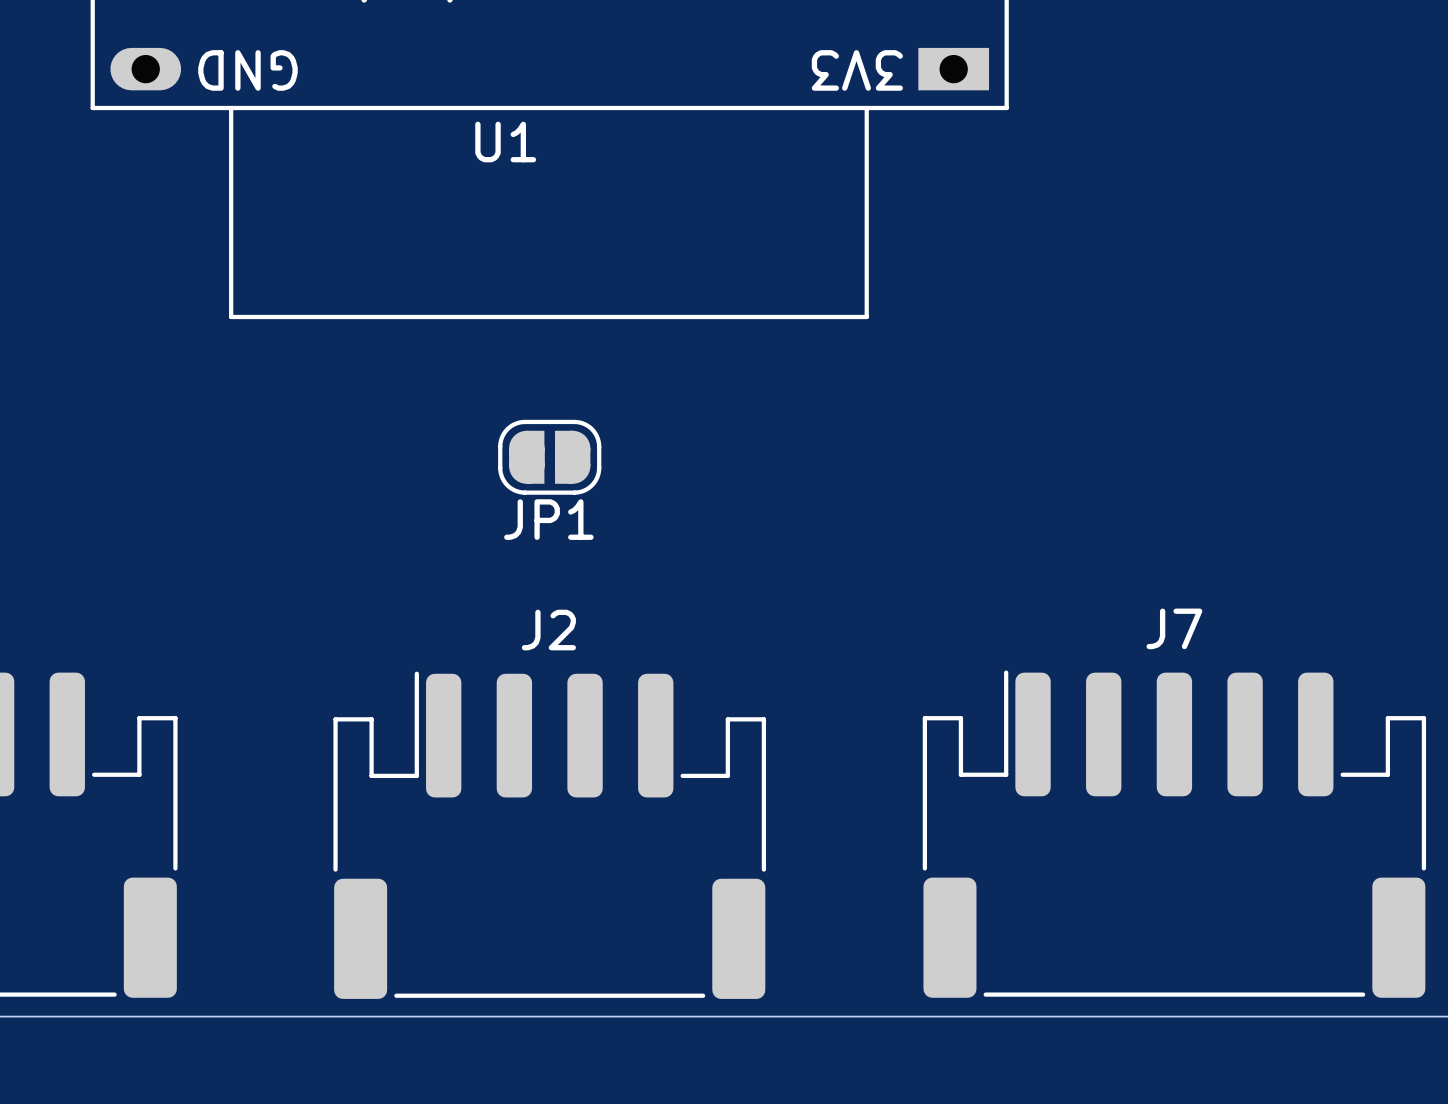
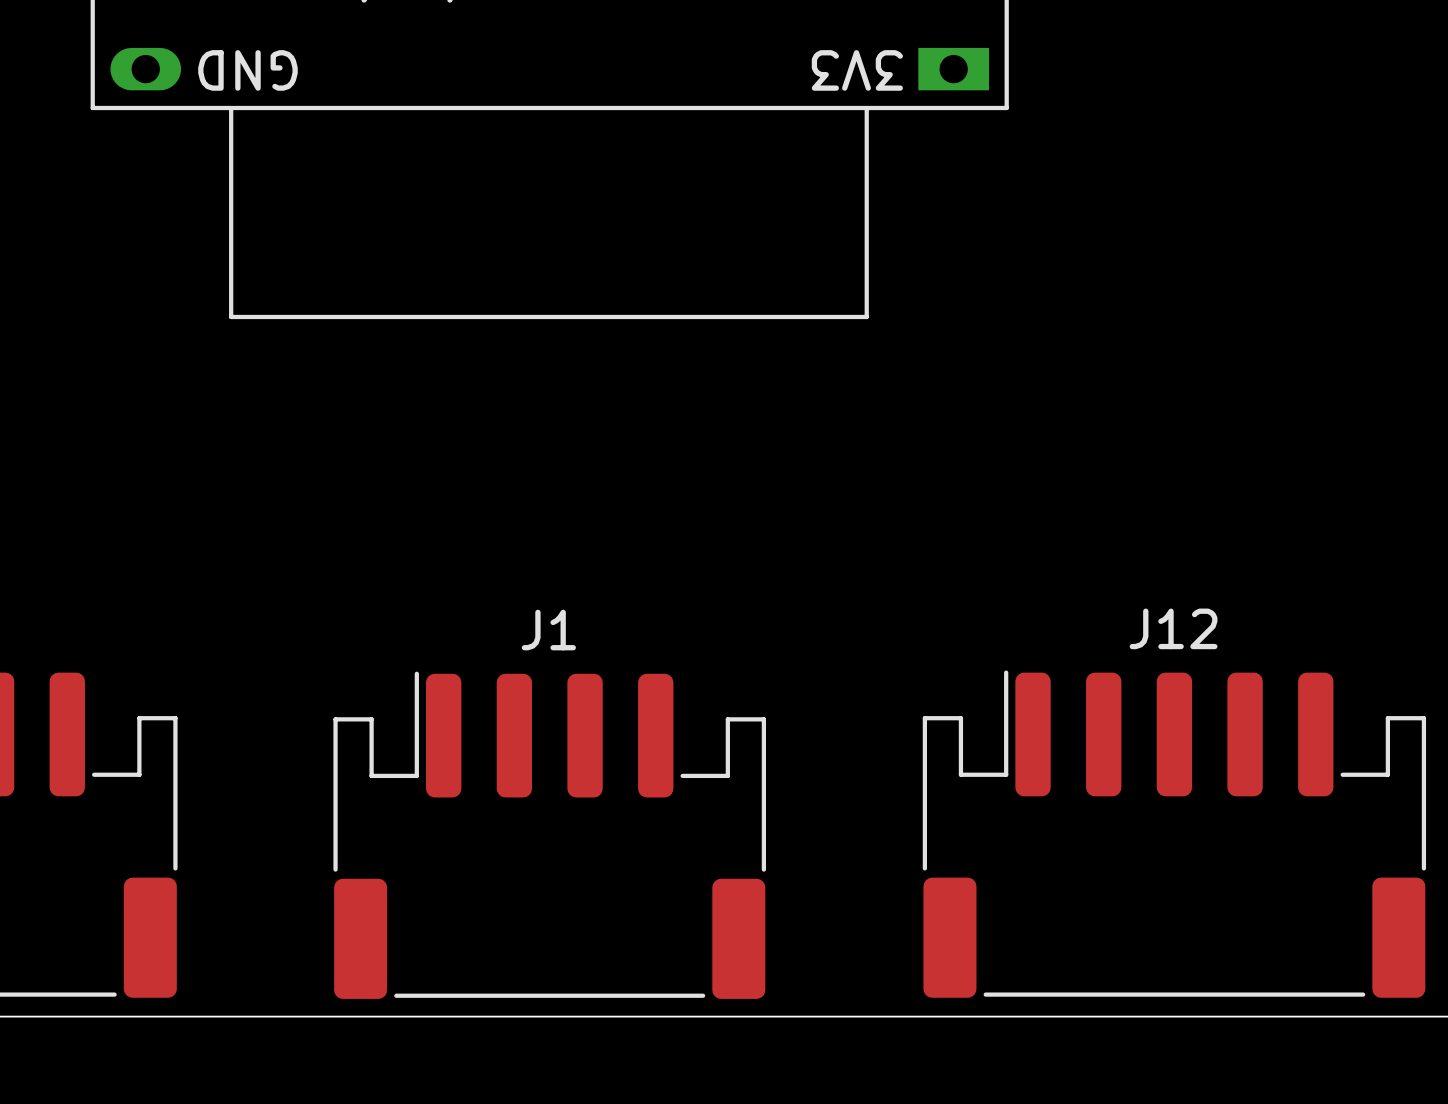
U1 name: U1 (505, 142) -> none
JP1: (549, 457) -> none
J7 name: J7 (1174, 628) -> J12 (1173, 628)
J2 name: J2 (548, 630) -> J1 (548, 630)

